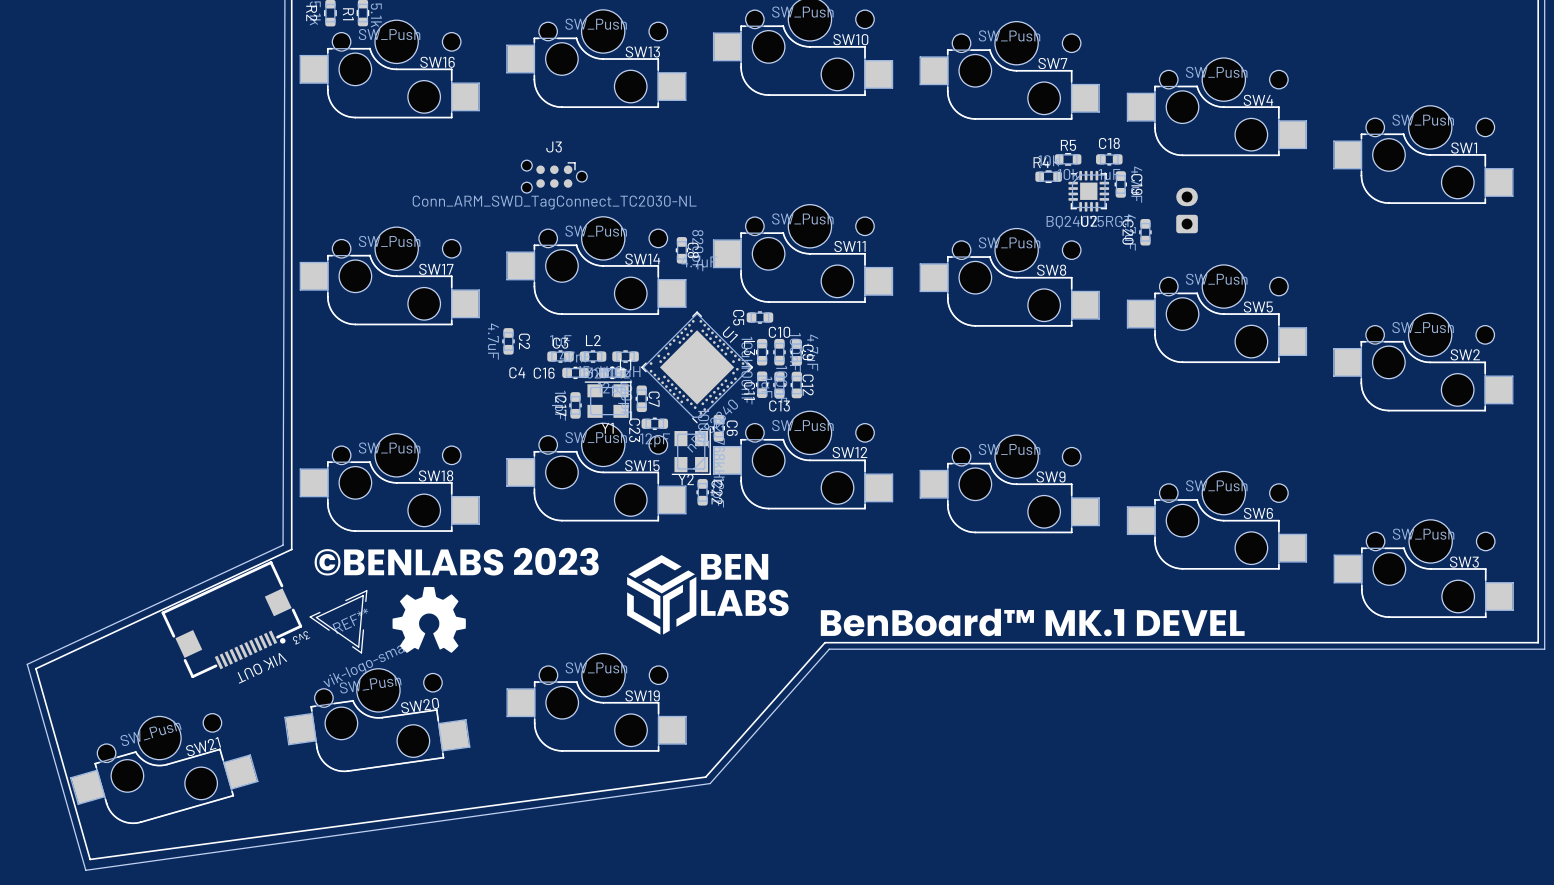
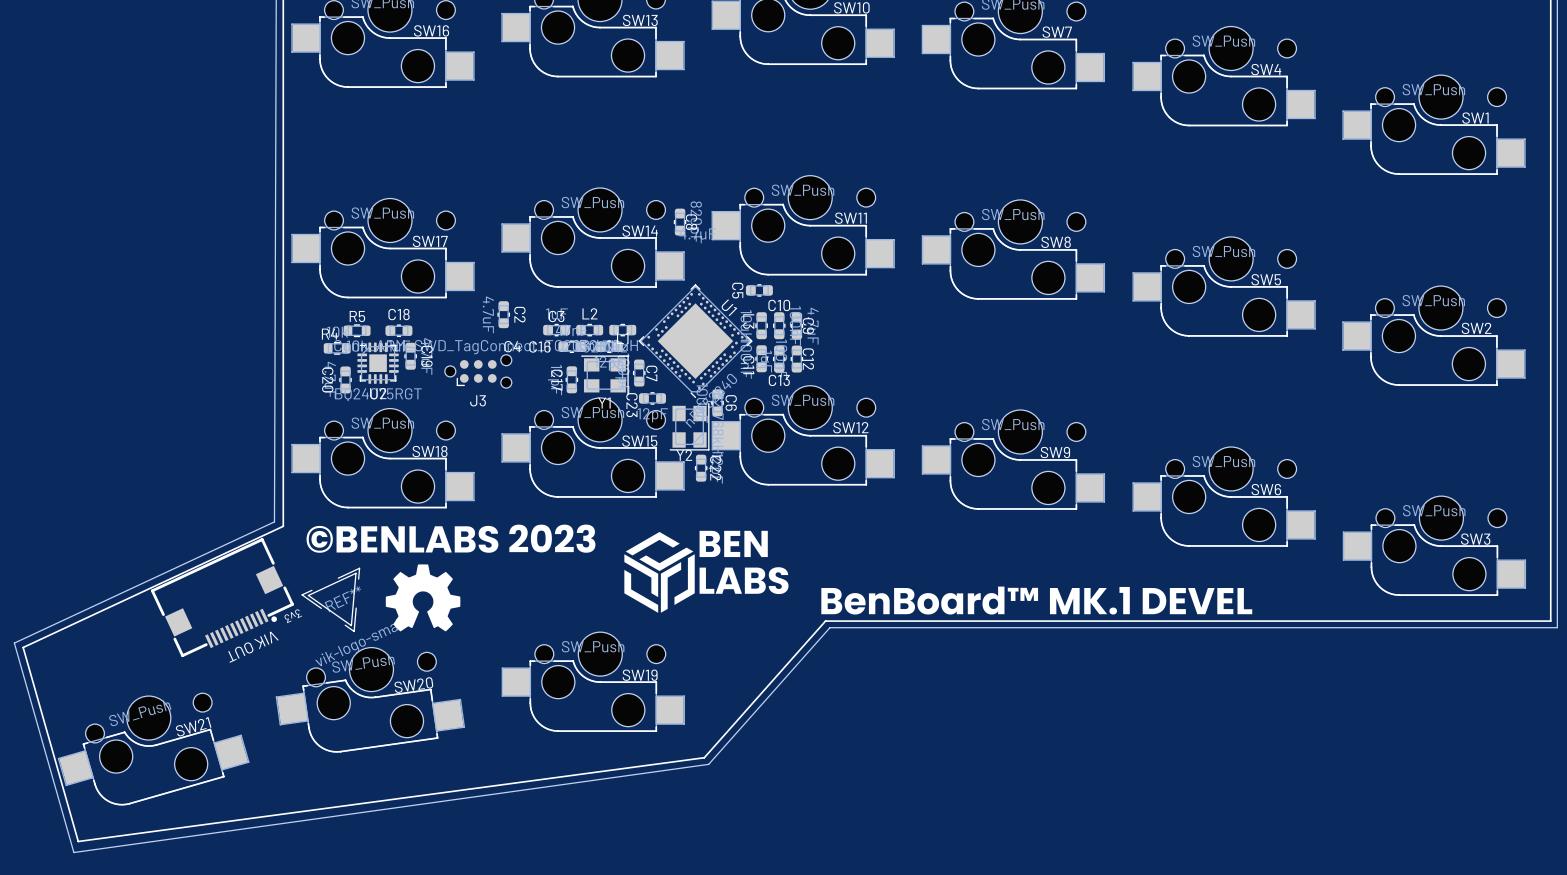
R5 position: (1068, 159) -> (357, 330)
C18 position: (1109, 159) -> (398, 330)
J3 rotation: 0° (554, 176) -> 180° (478, 371)
J3 position: (554, 176) -> (478, 371)
R4 position: (1048, 176) -> (337, 348)
C19 position: (1120, 184) -> (410, 356)
U2 position: (1088, 191) -> (378, 363)
part: (1187, 210) -> none
C20 position: (1145, 232) -> (345, 379)

